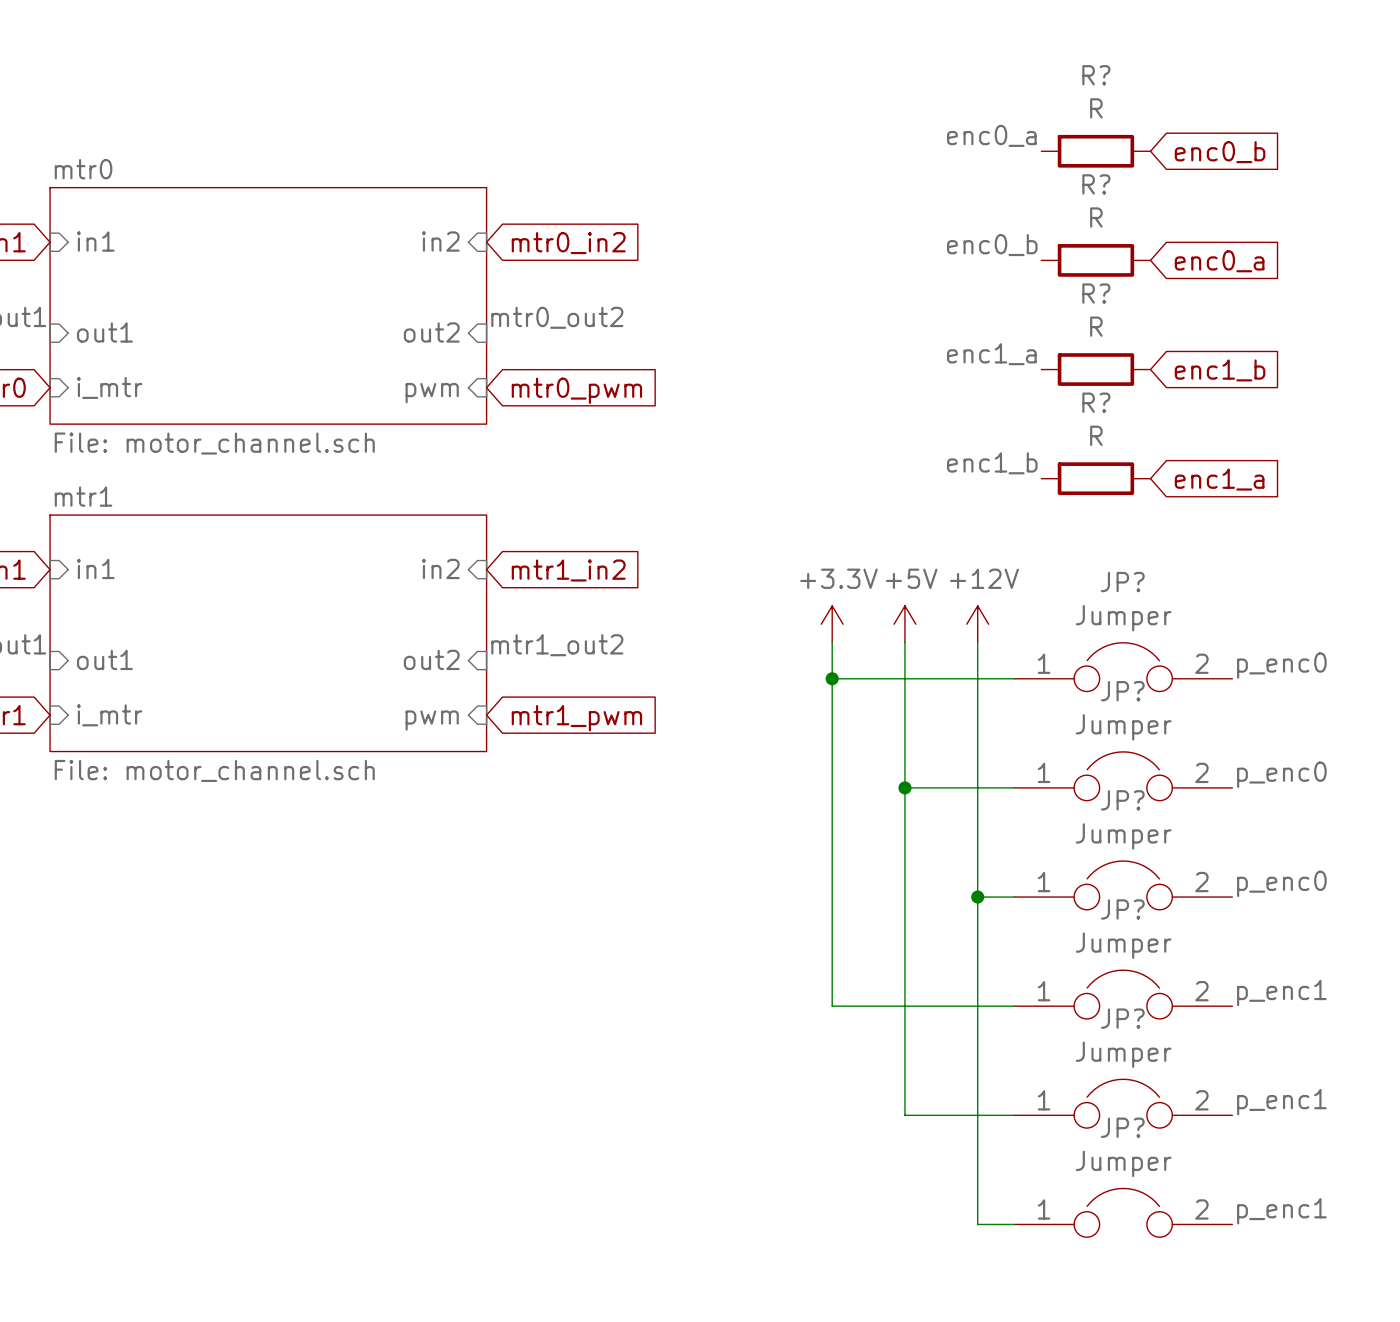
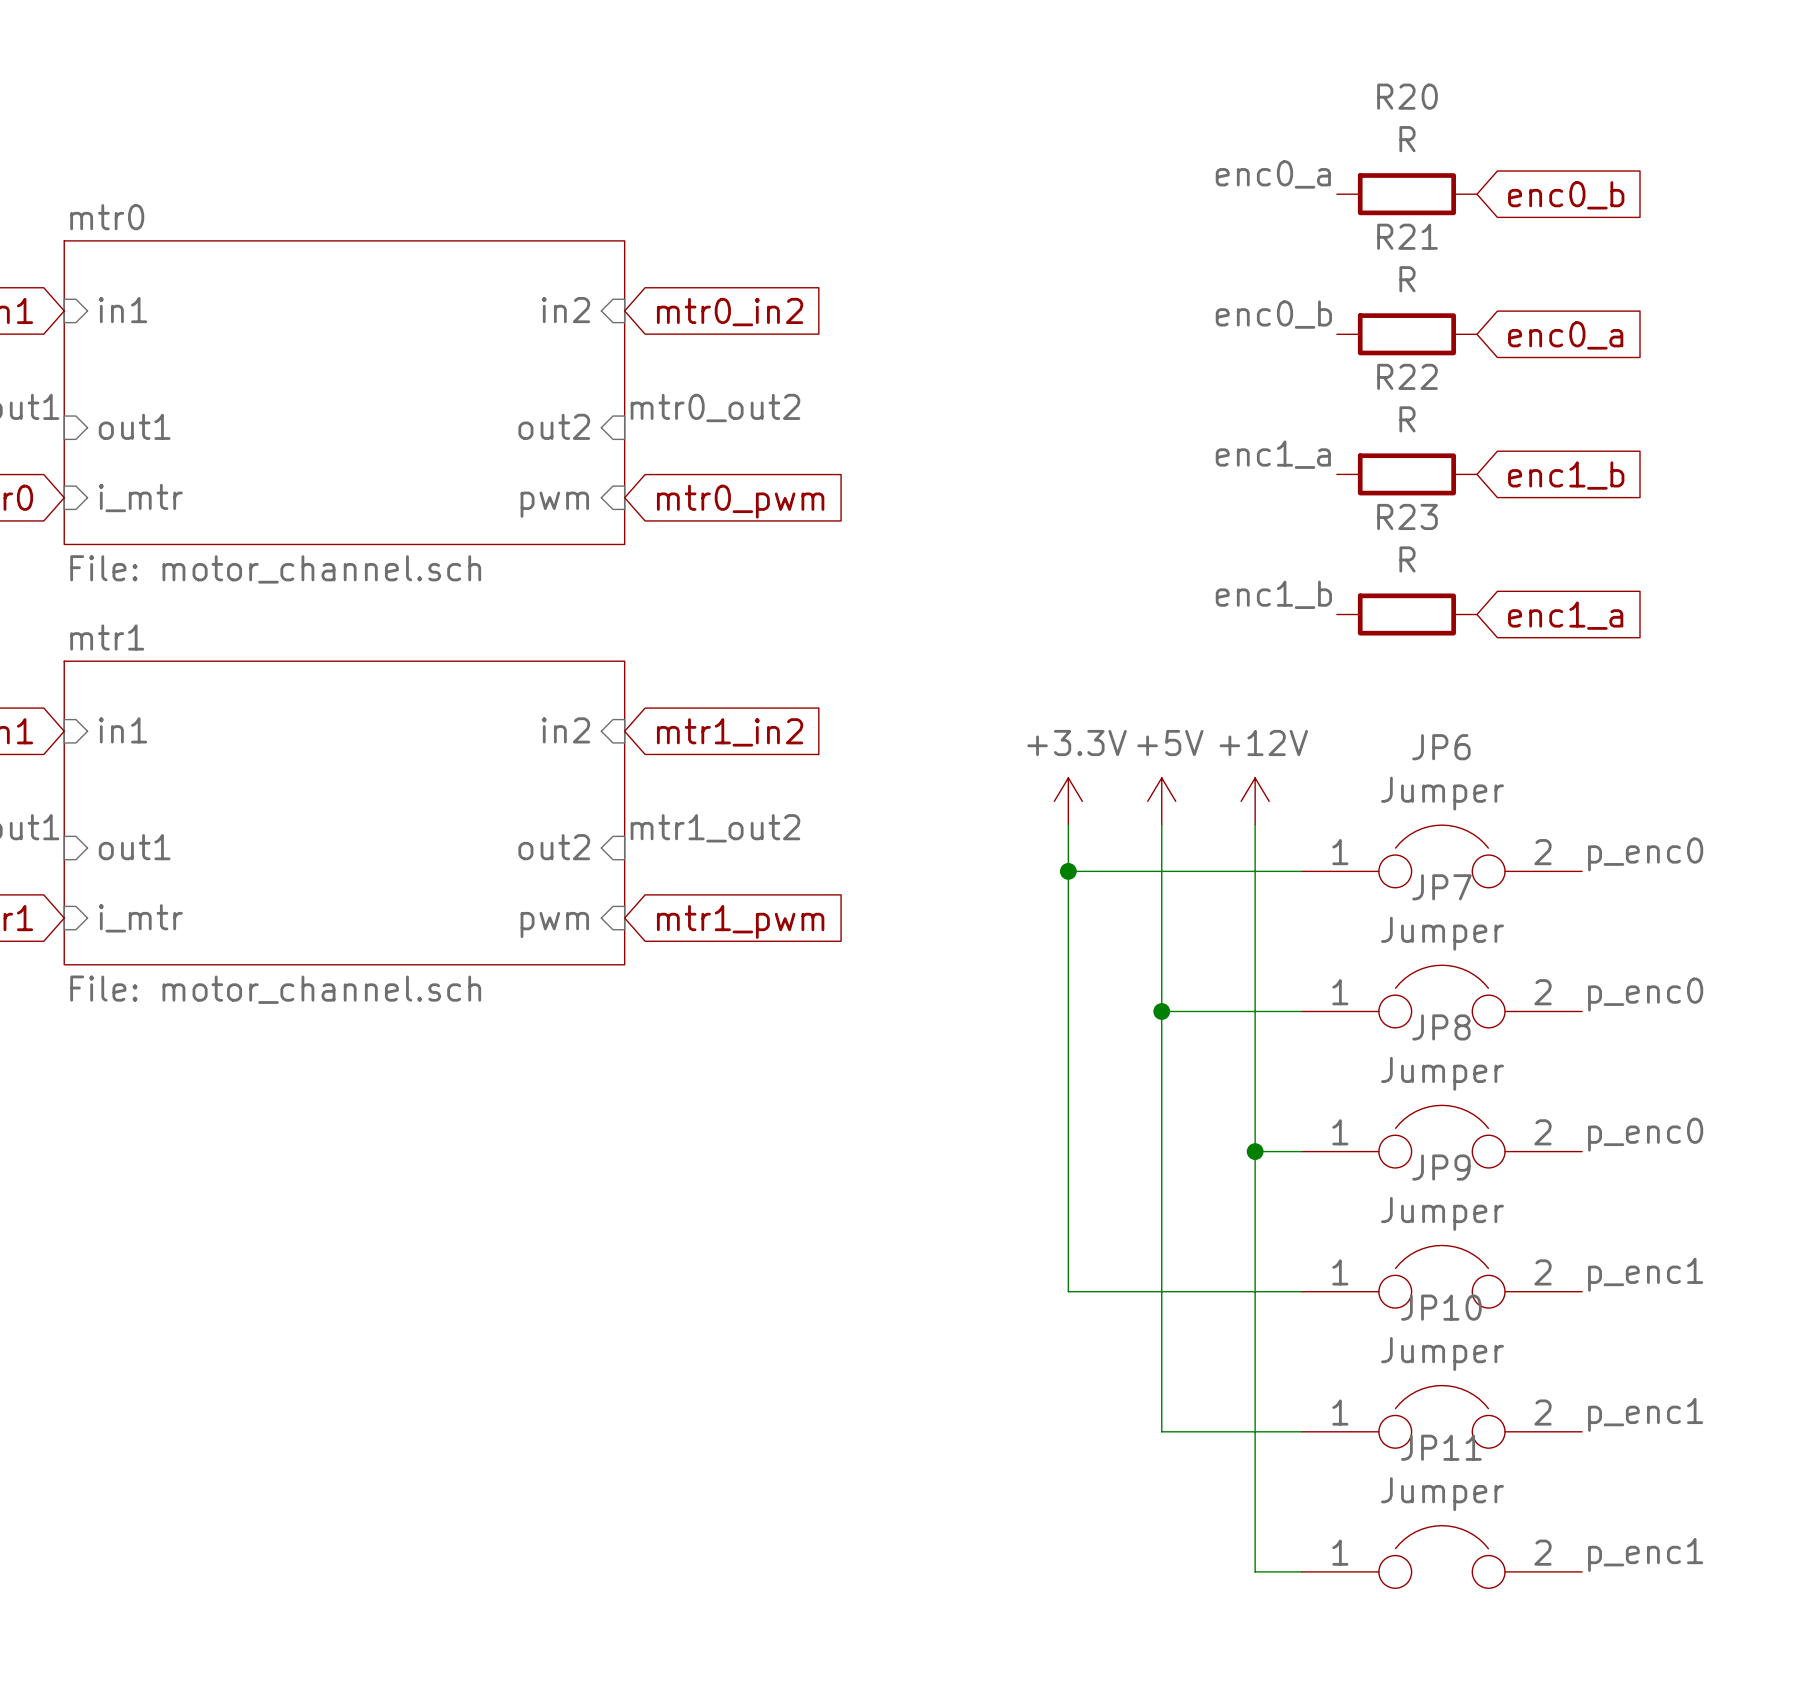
R? name: R? (1096, 75) -> R20 (1407, 96)
R? name: R? (1096, 184) -> R21 (1407, 236)
R? name: R? (1096, 293) -> R22 (1407, 376)
R? name: R? (1096, 402) -> R23 (1407, 516)
JP? name: JP? (1122, 582) -> JP6 (1441, 747)
JP? name: JP? (1122, 691) -> JP7 (1441, 887)
JP? name: JP? (1122, 800) -> JP8 (1441, 1027)
JP? name: JP? (1122, 909) -> JP9 (1441, 1167)
JP? name: JP? (1122, 1018) -> JP10 (1441, 1307)
JP? name: JP? (1122, 1127) -> JP11 (1441, 1447)

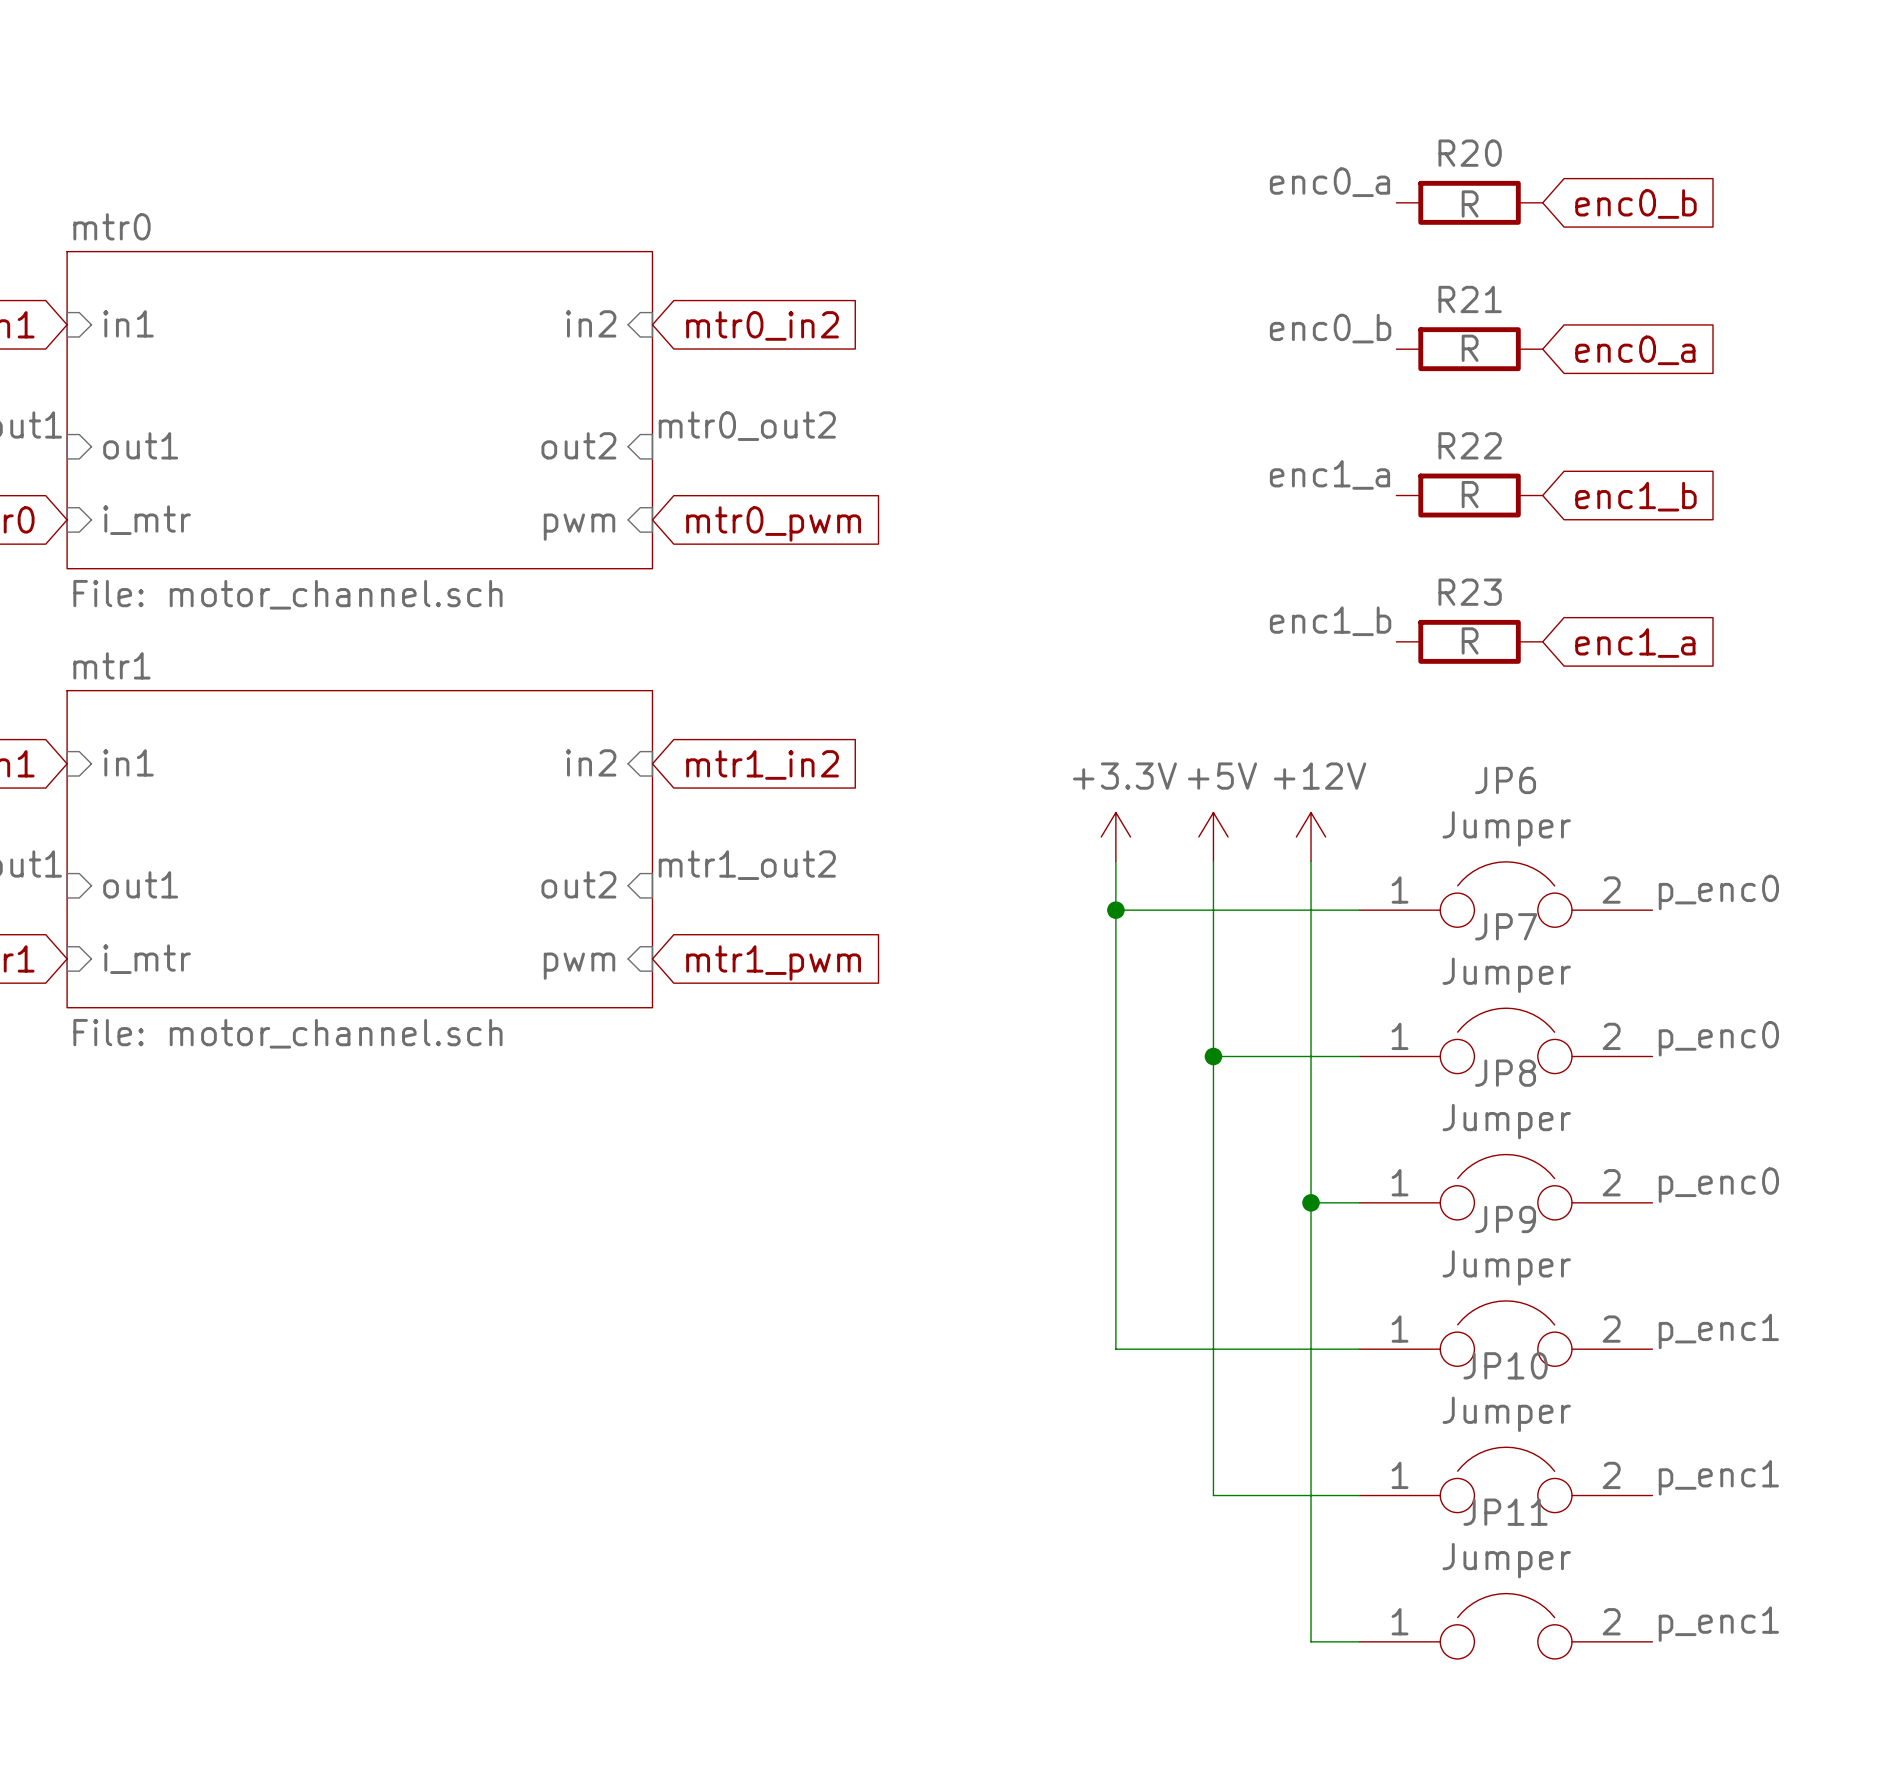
R20 name position: R20 (1407, 96) -> R20 (1470, 153)
R20 value position: R (1407, 139) -> R (1470, 204)
R21 name position: R21 (1407, 236) -> R21 (1470, 299)
R21 value position: R (1407, 279) -> R (1470, 348)
R22 name position: R22 (1407, 376) -> R22 (1470, 445)
R22 value position: R (1407, 419) -> R (1470, 494)
R23 name position: R23 (1407, 516) -> R23 (1470, 592)
R23 value position: R (1407, 559) -> R (1470, 640)

